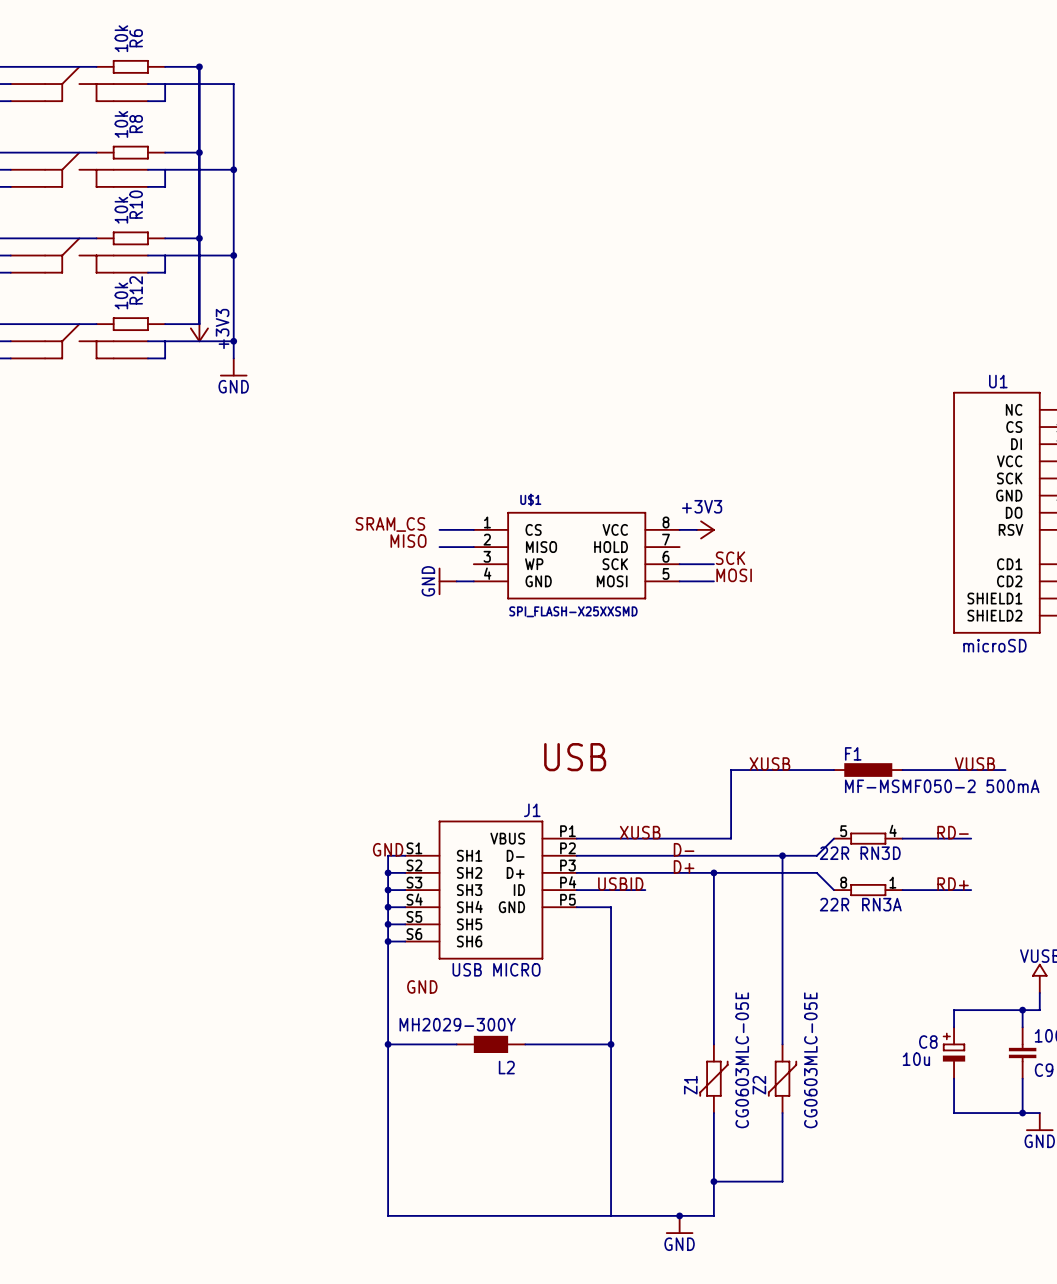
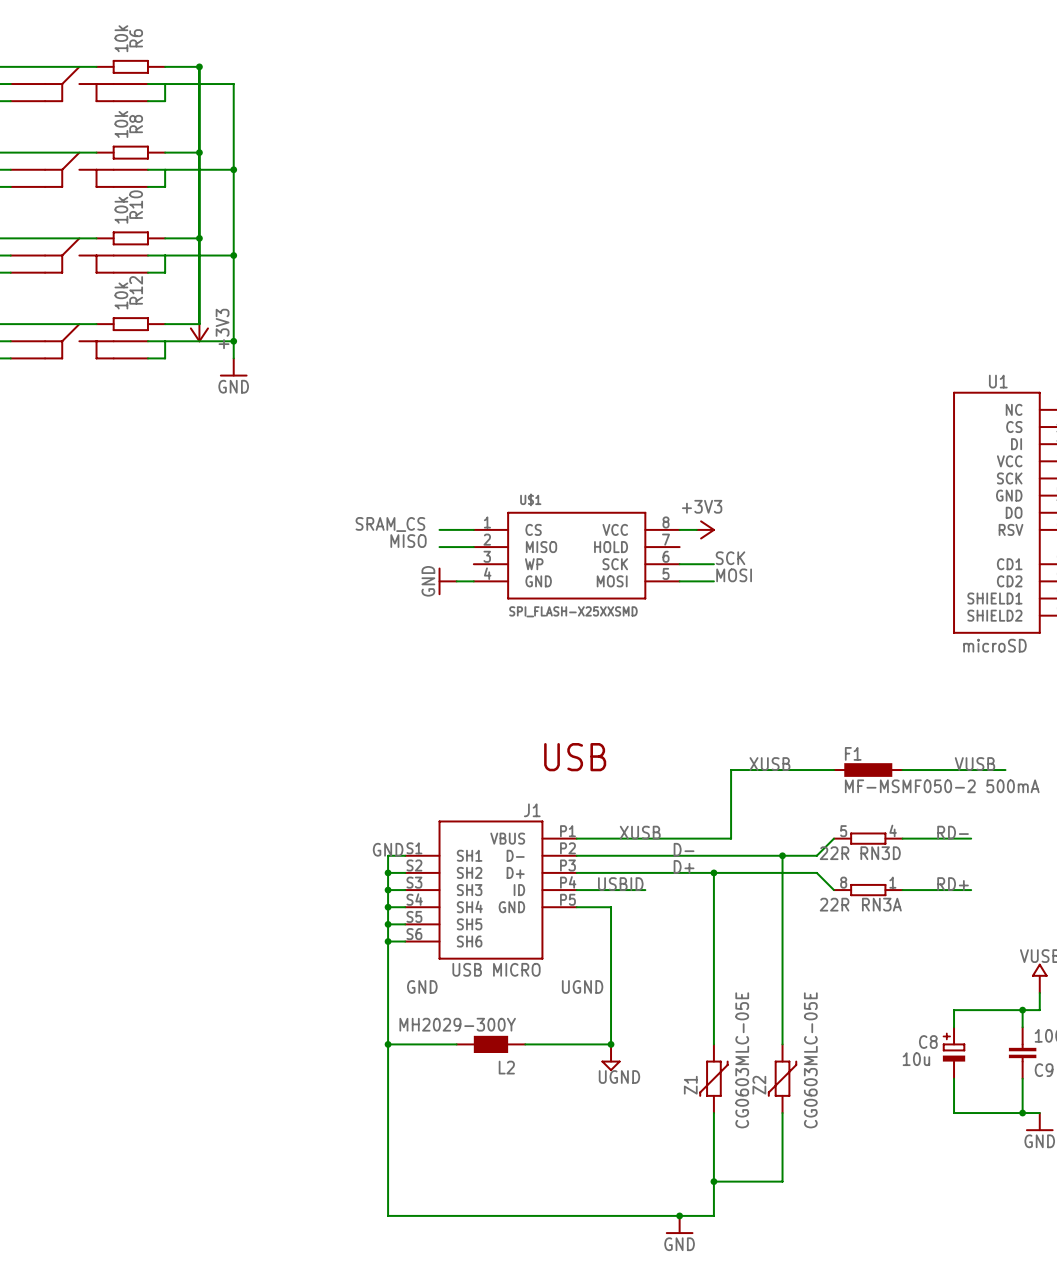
label: none -> UGND (582, 986)
wire: (611, 1044) (611, 1215) -> none
power symbol: none -> UGND (611, 1057)

